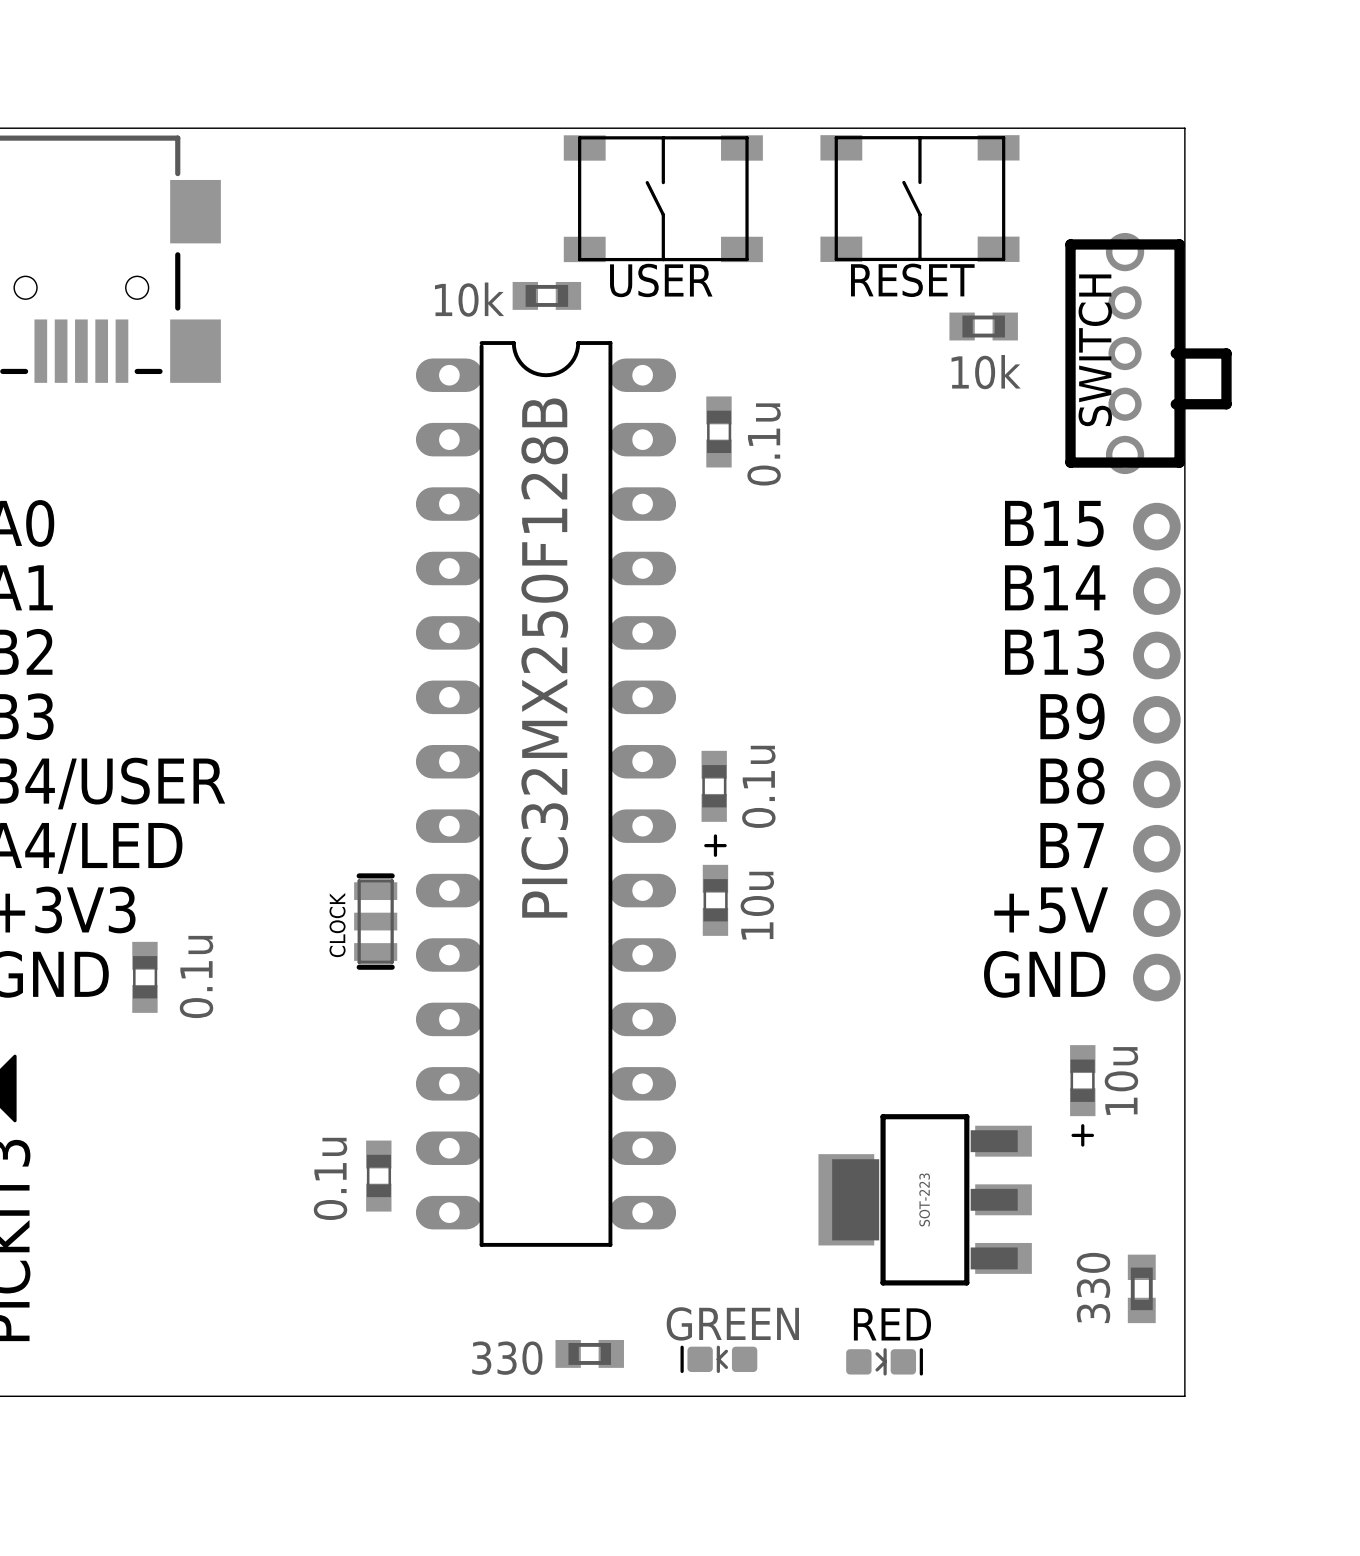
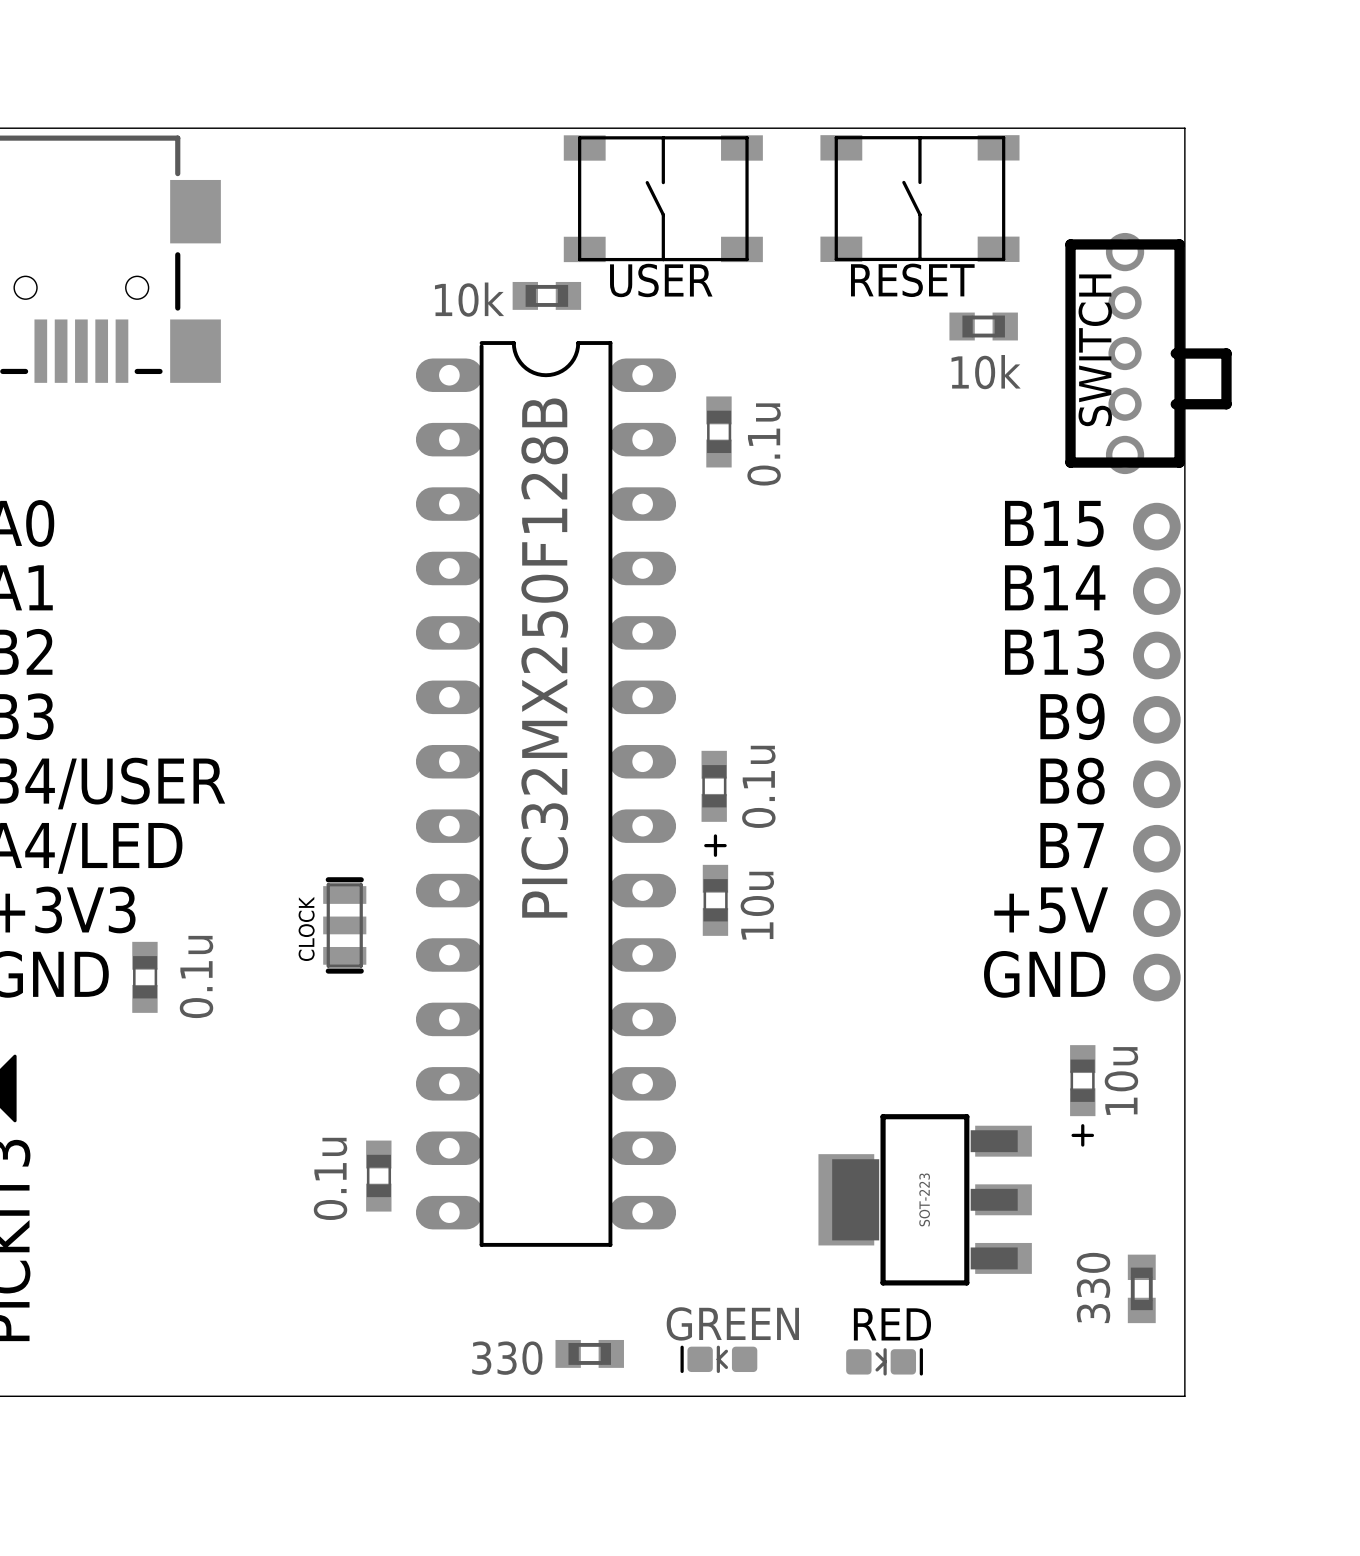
CLOCK position: (375, 921) -> (344, 925)

